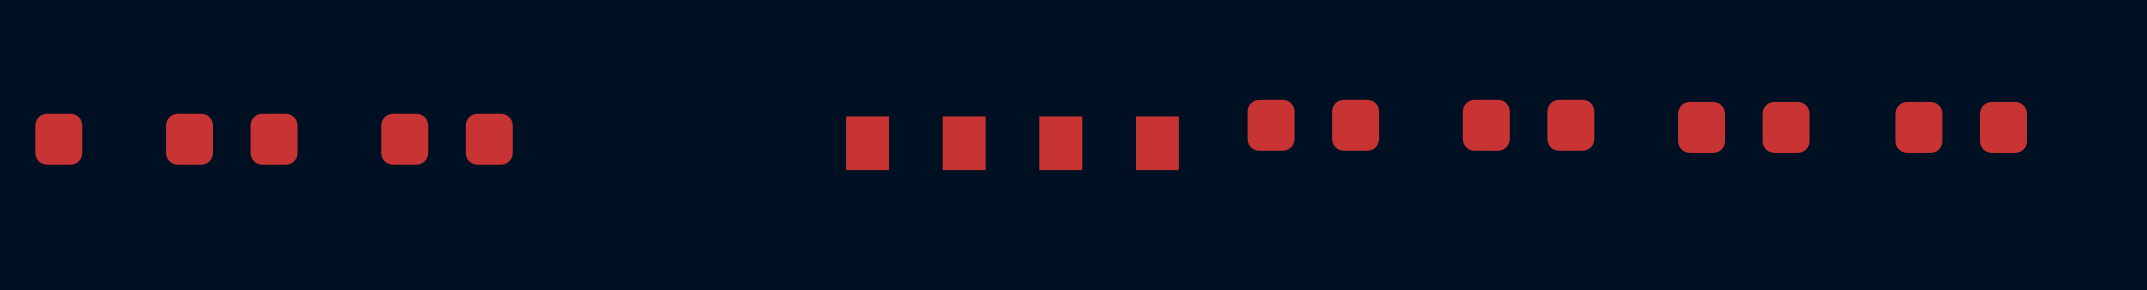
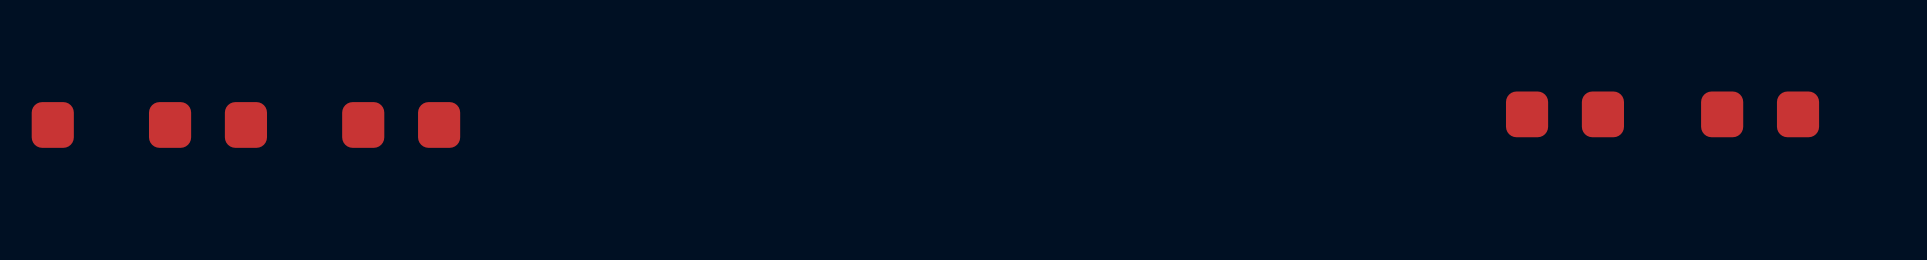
part: (1313, 125) -> none
part: (1528, 125) -> none
part: (915, 143) -> none
part: (1109, 143) -> none

